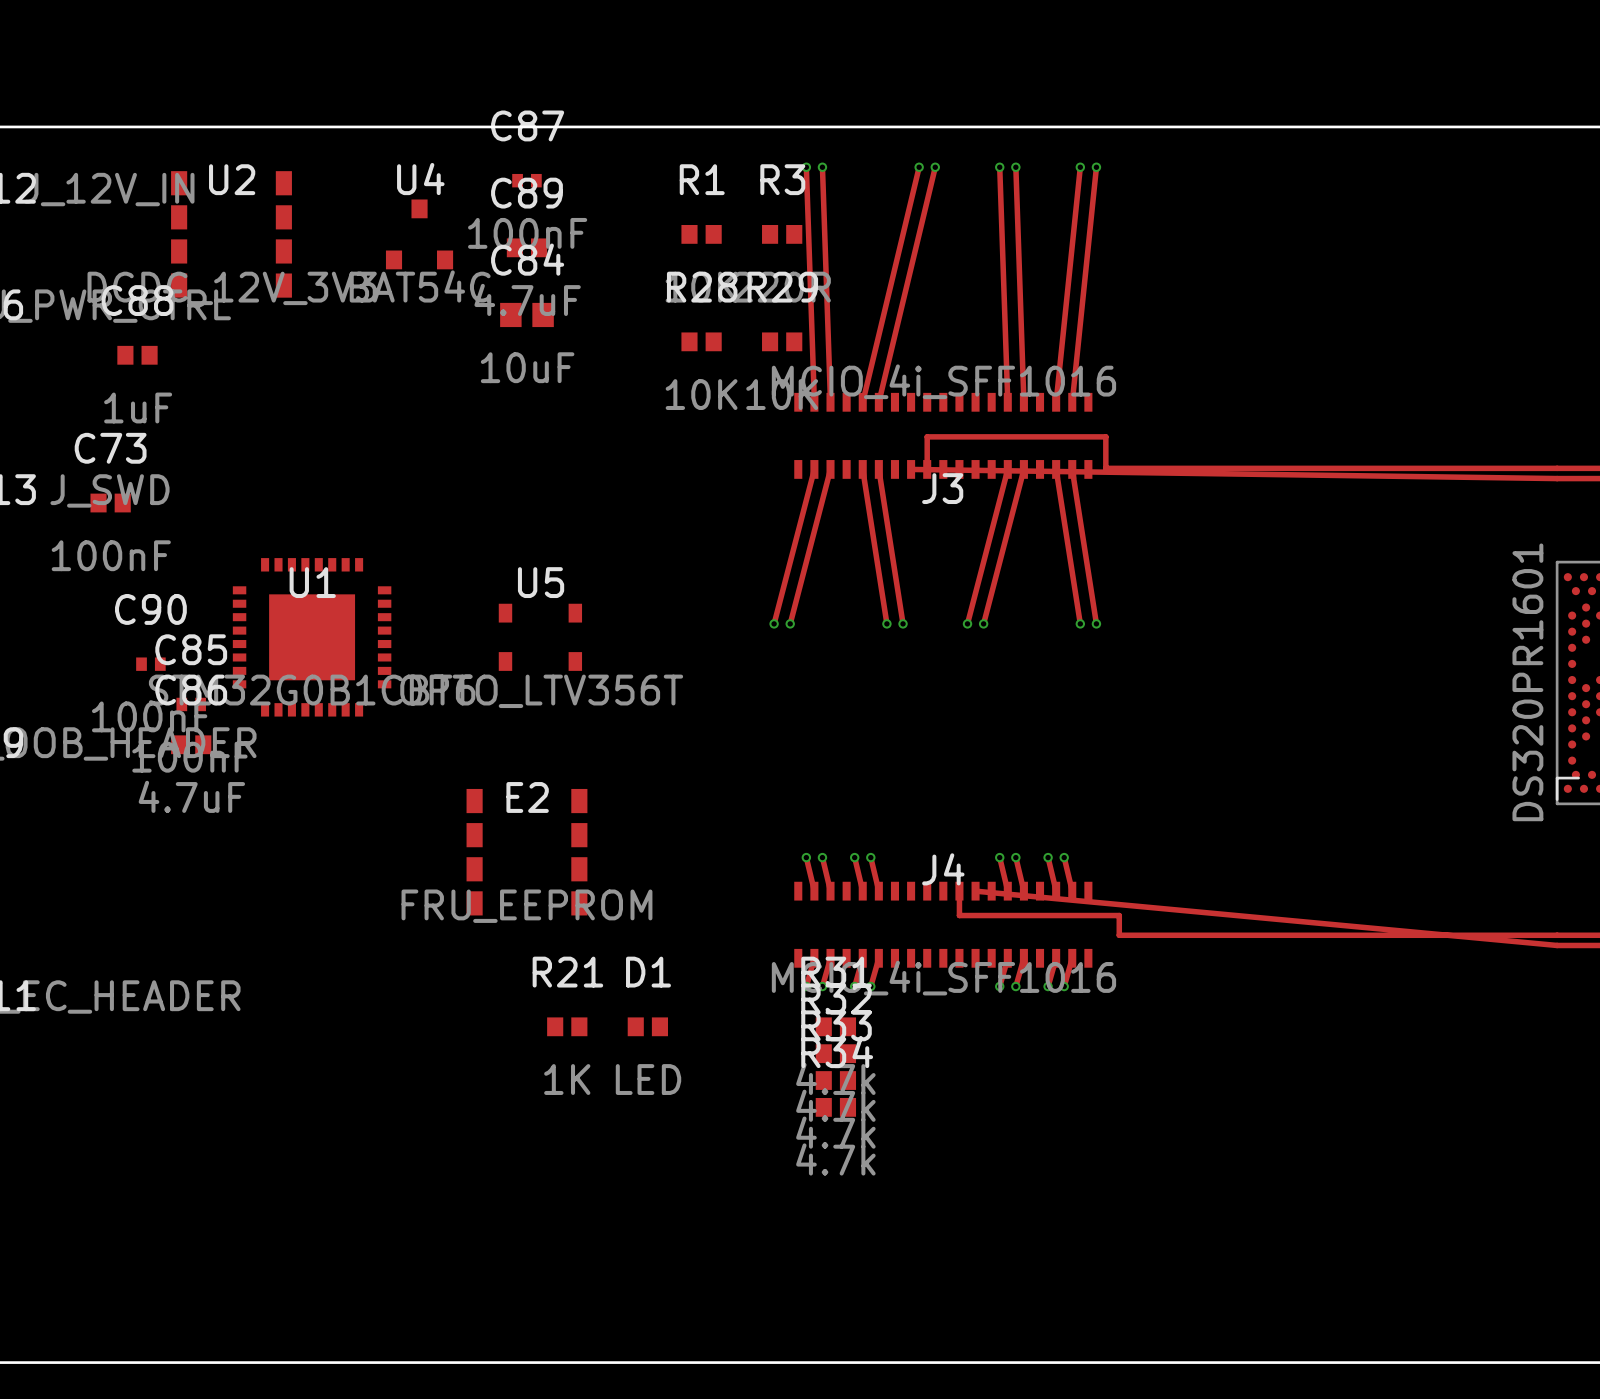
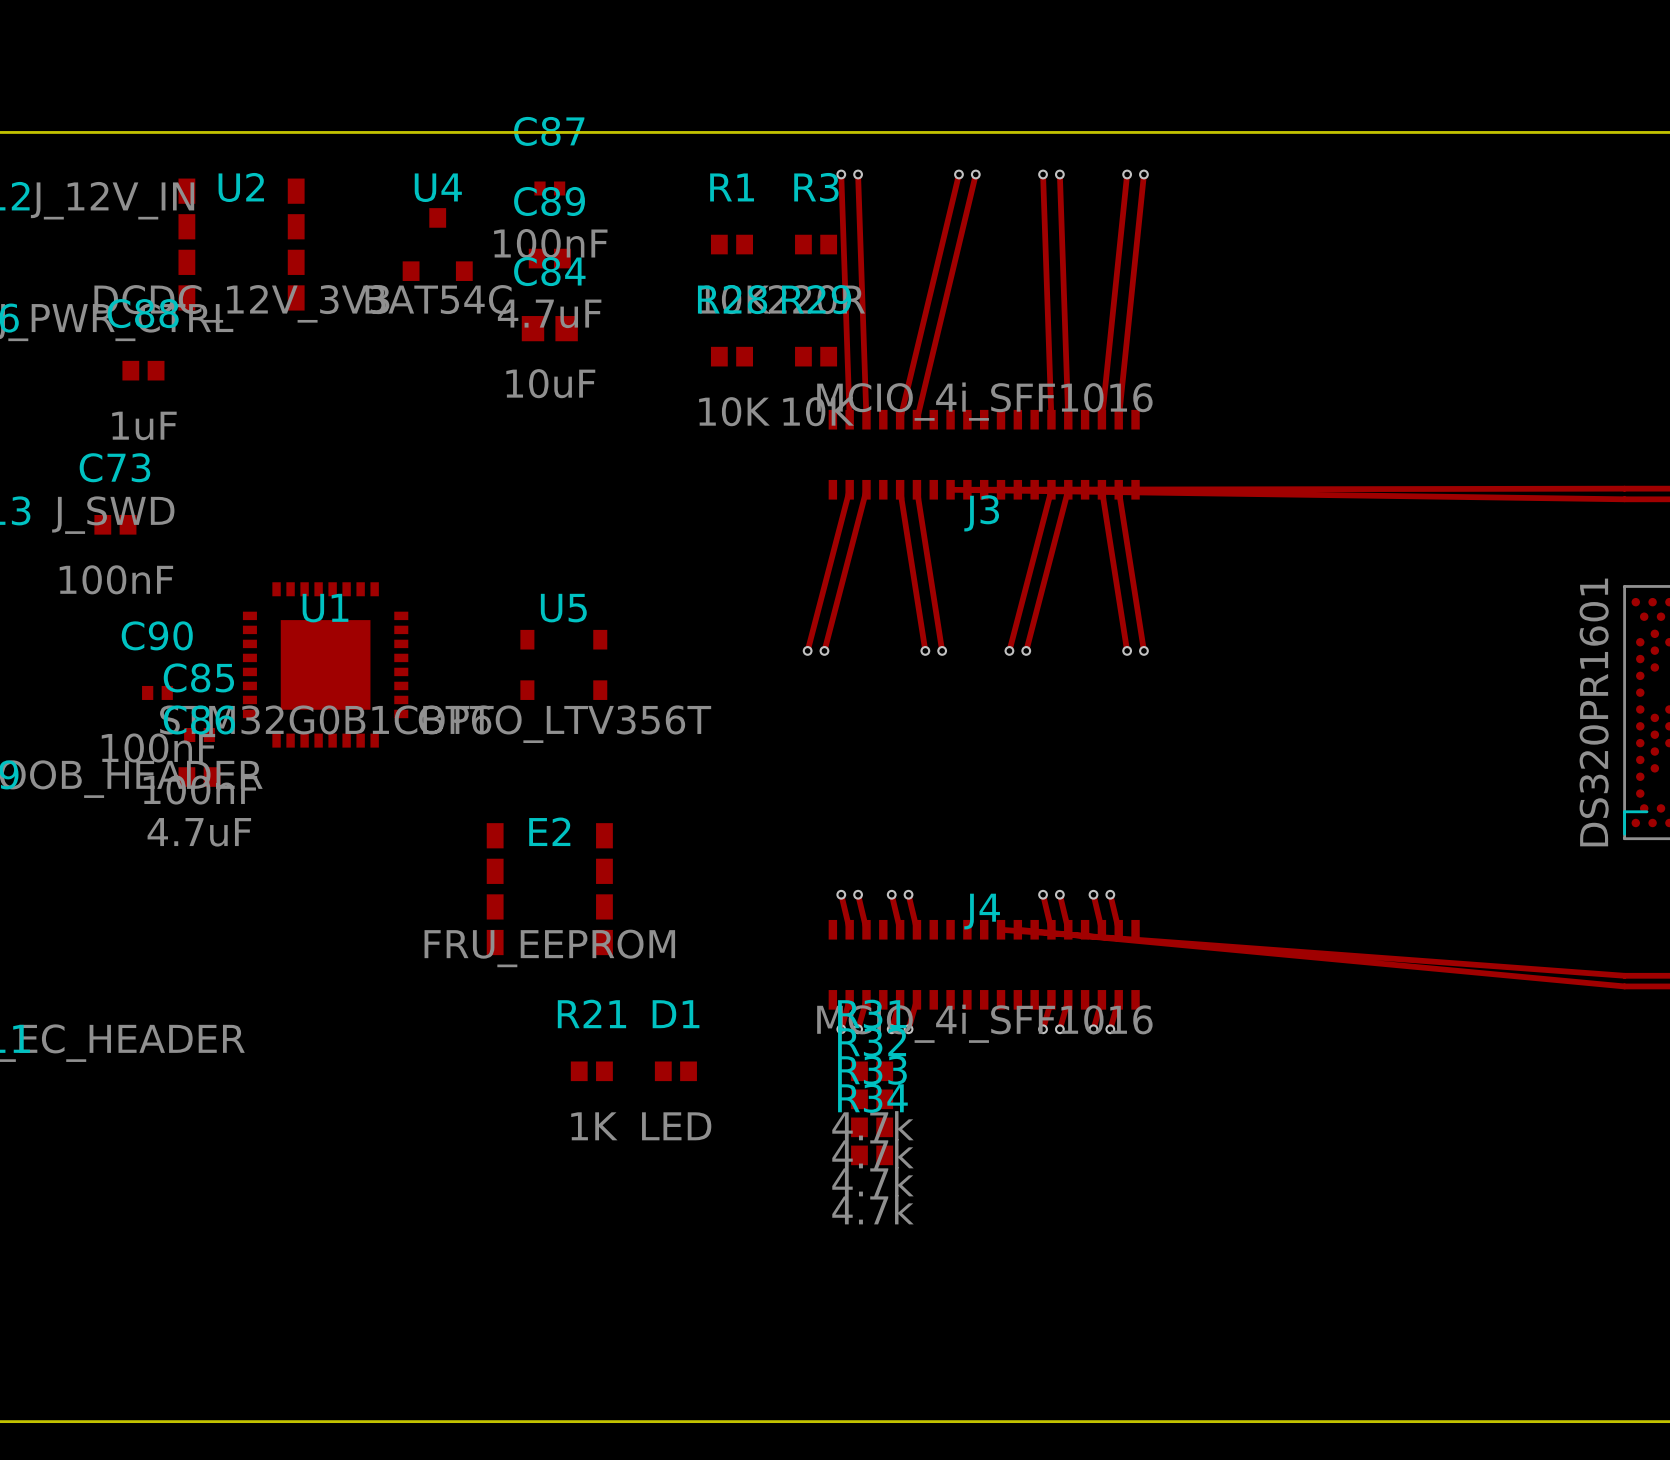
track: (1557, 468) (1105, 468) (1105, 436) (927, 436) (927, 469) -> (1624, 488) (967, 489)
track: (959, 891) (959, 915) (1119, 915) (1119, 935) (1557, 935) -> (1001, 929) (1624, 975)

